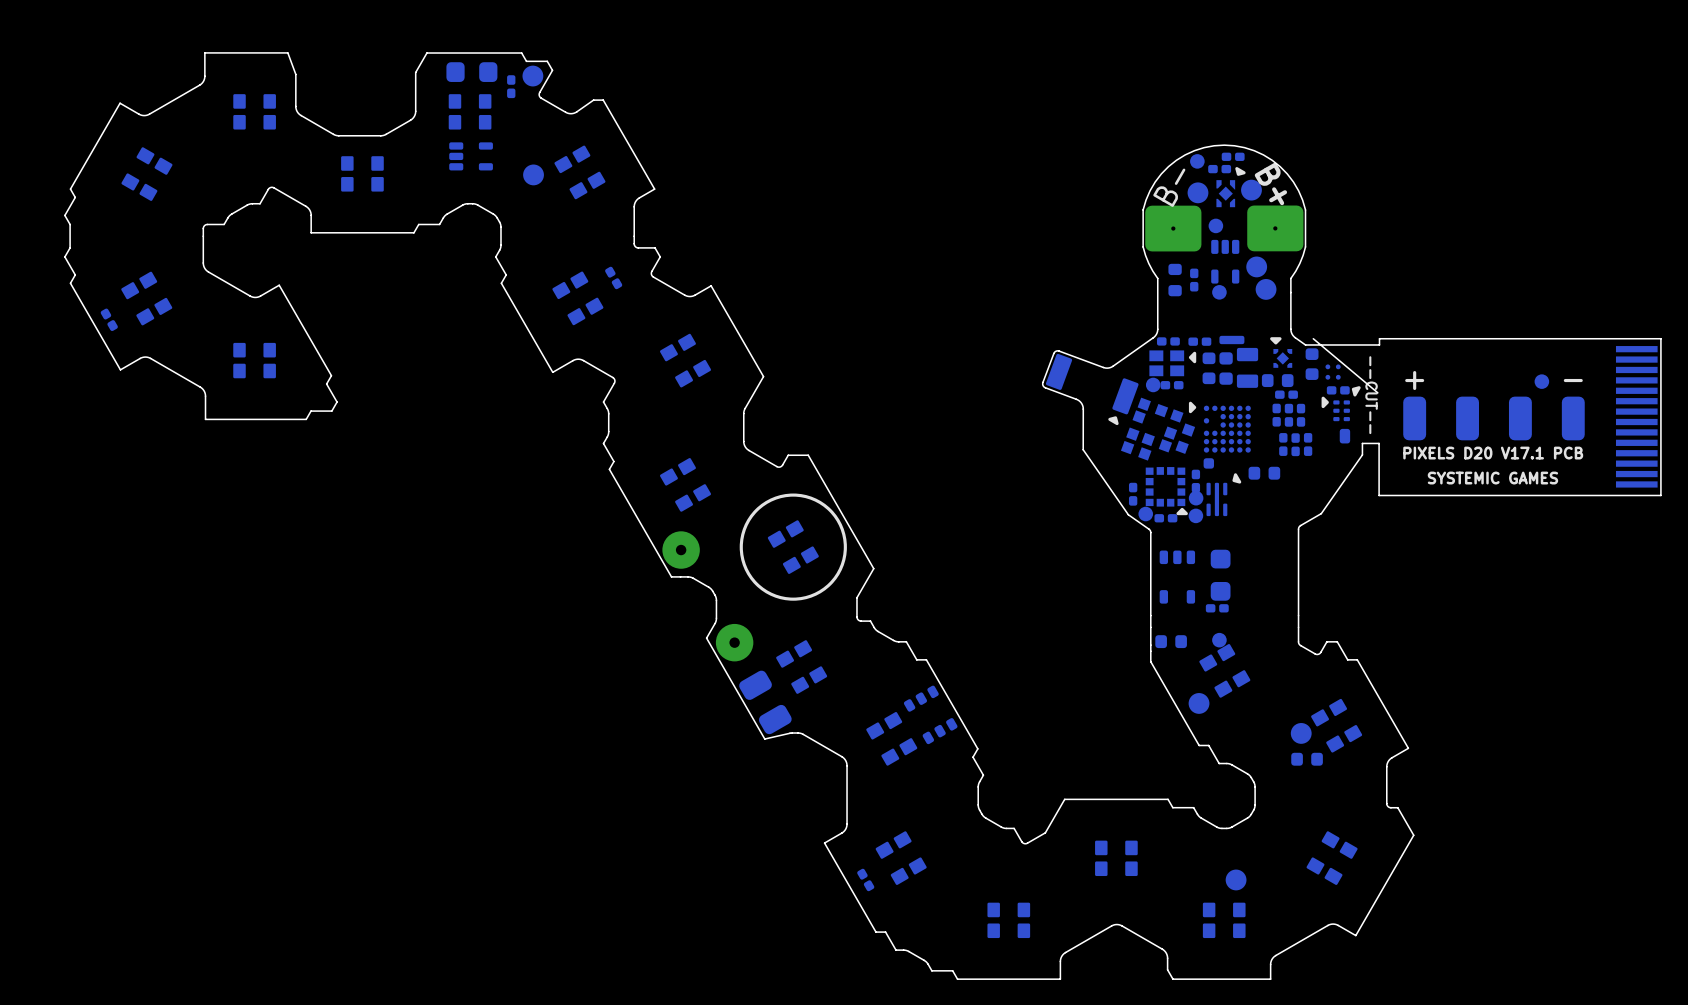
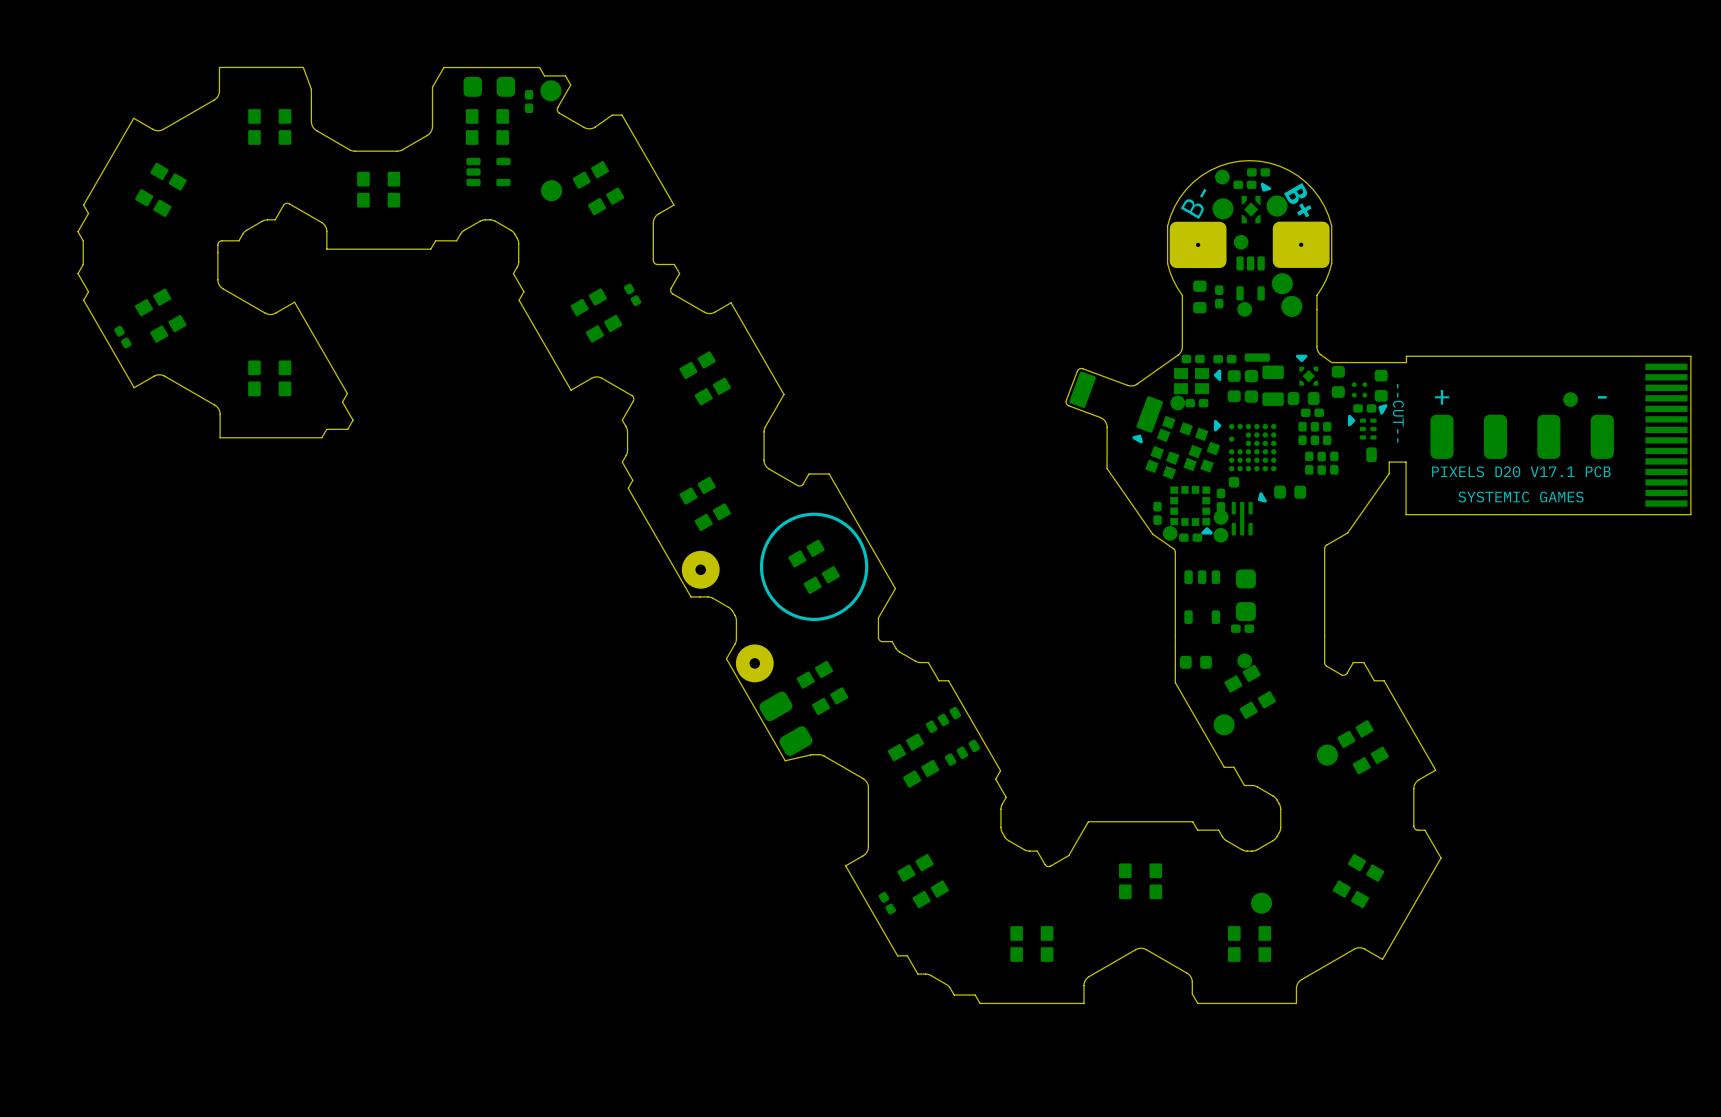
board edge: (1313, 338) (1377, 392) -> none
part rotation: 0° (1307, 759) -> 90° clockwise (1381, 385)
part position: (1307, 759) -> (1381, 385)

